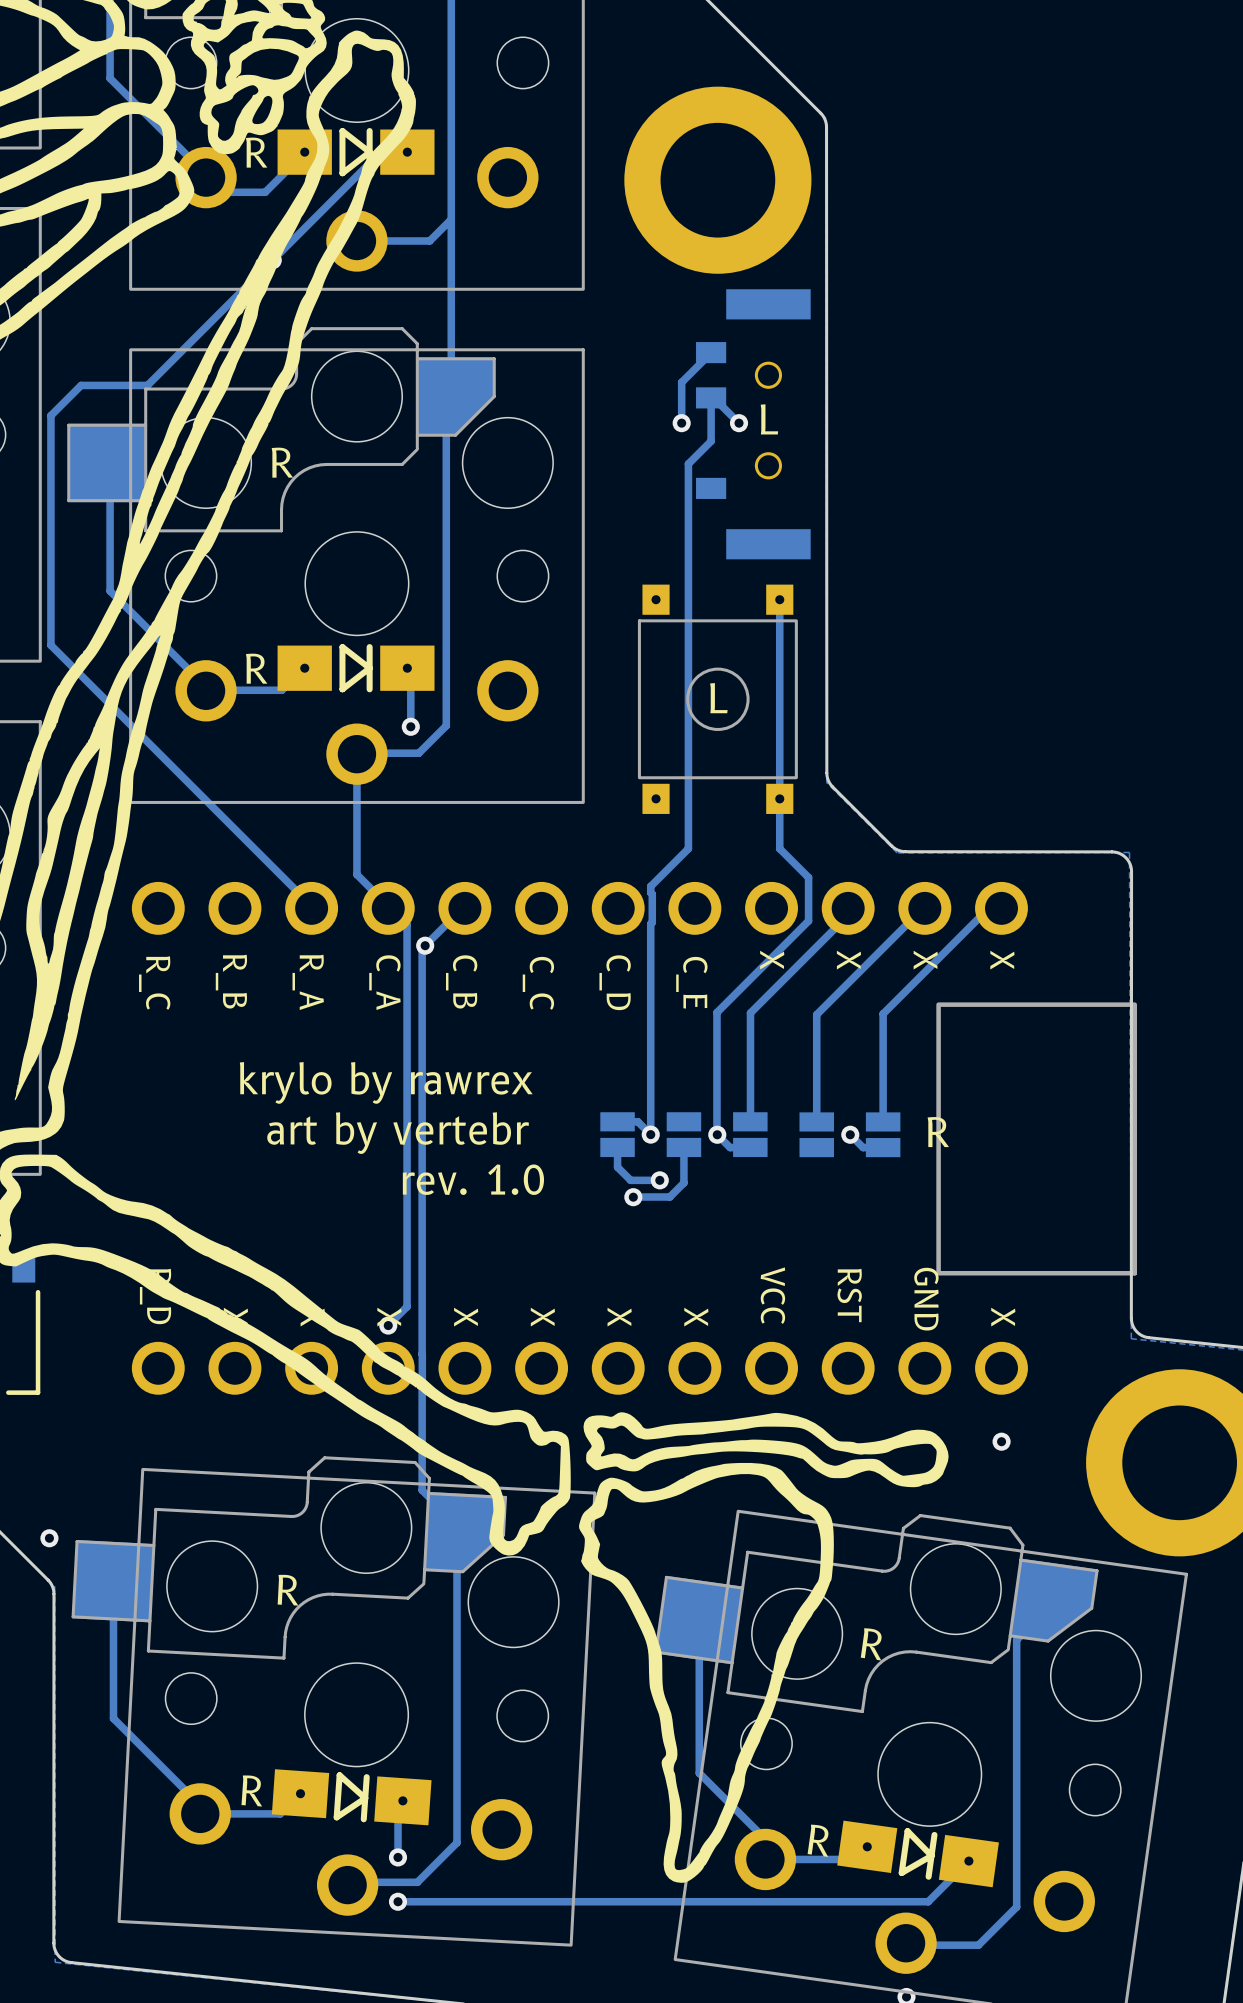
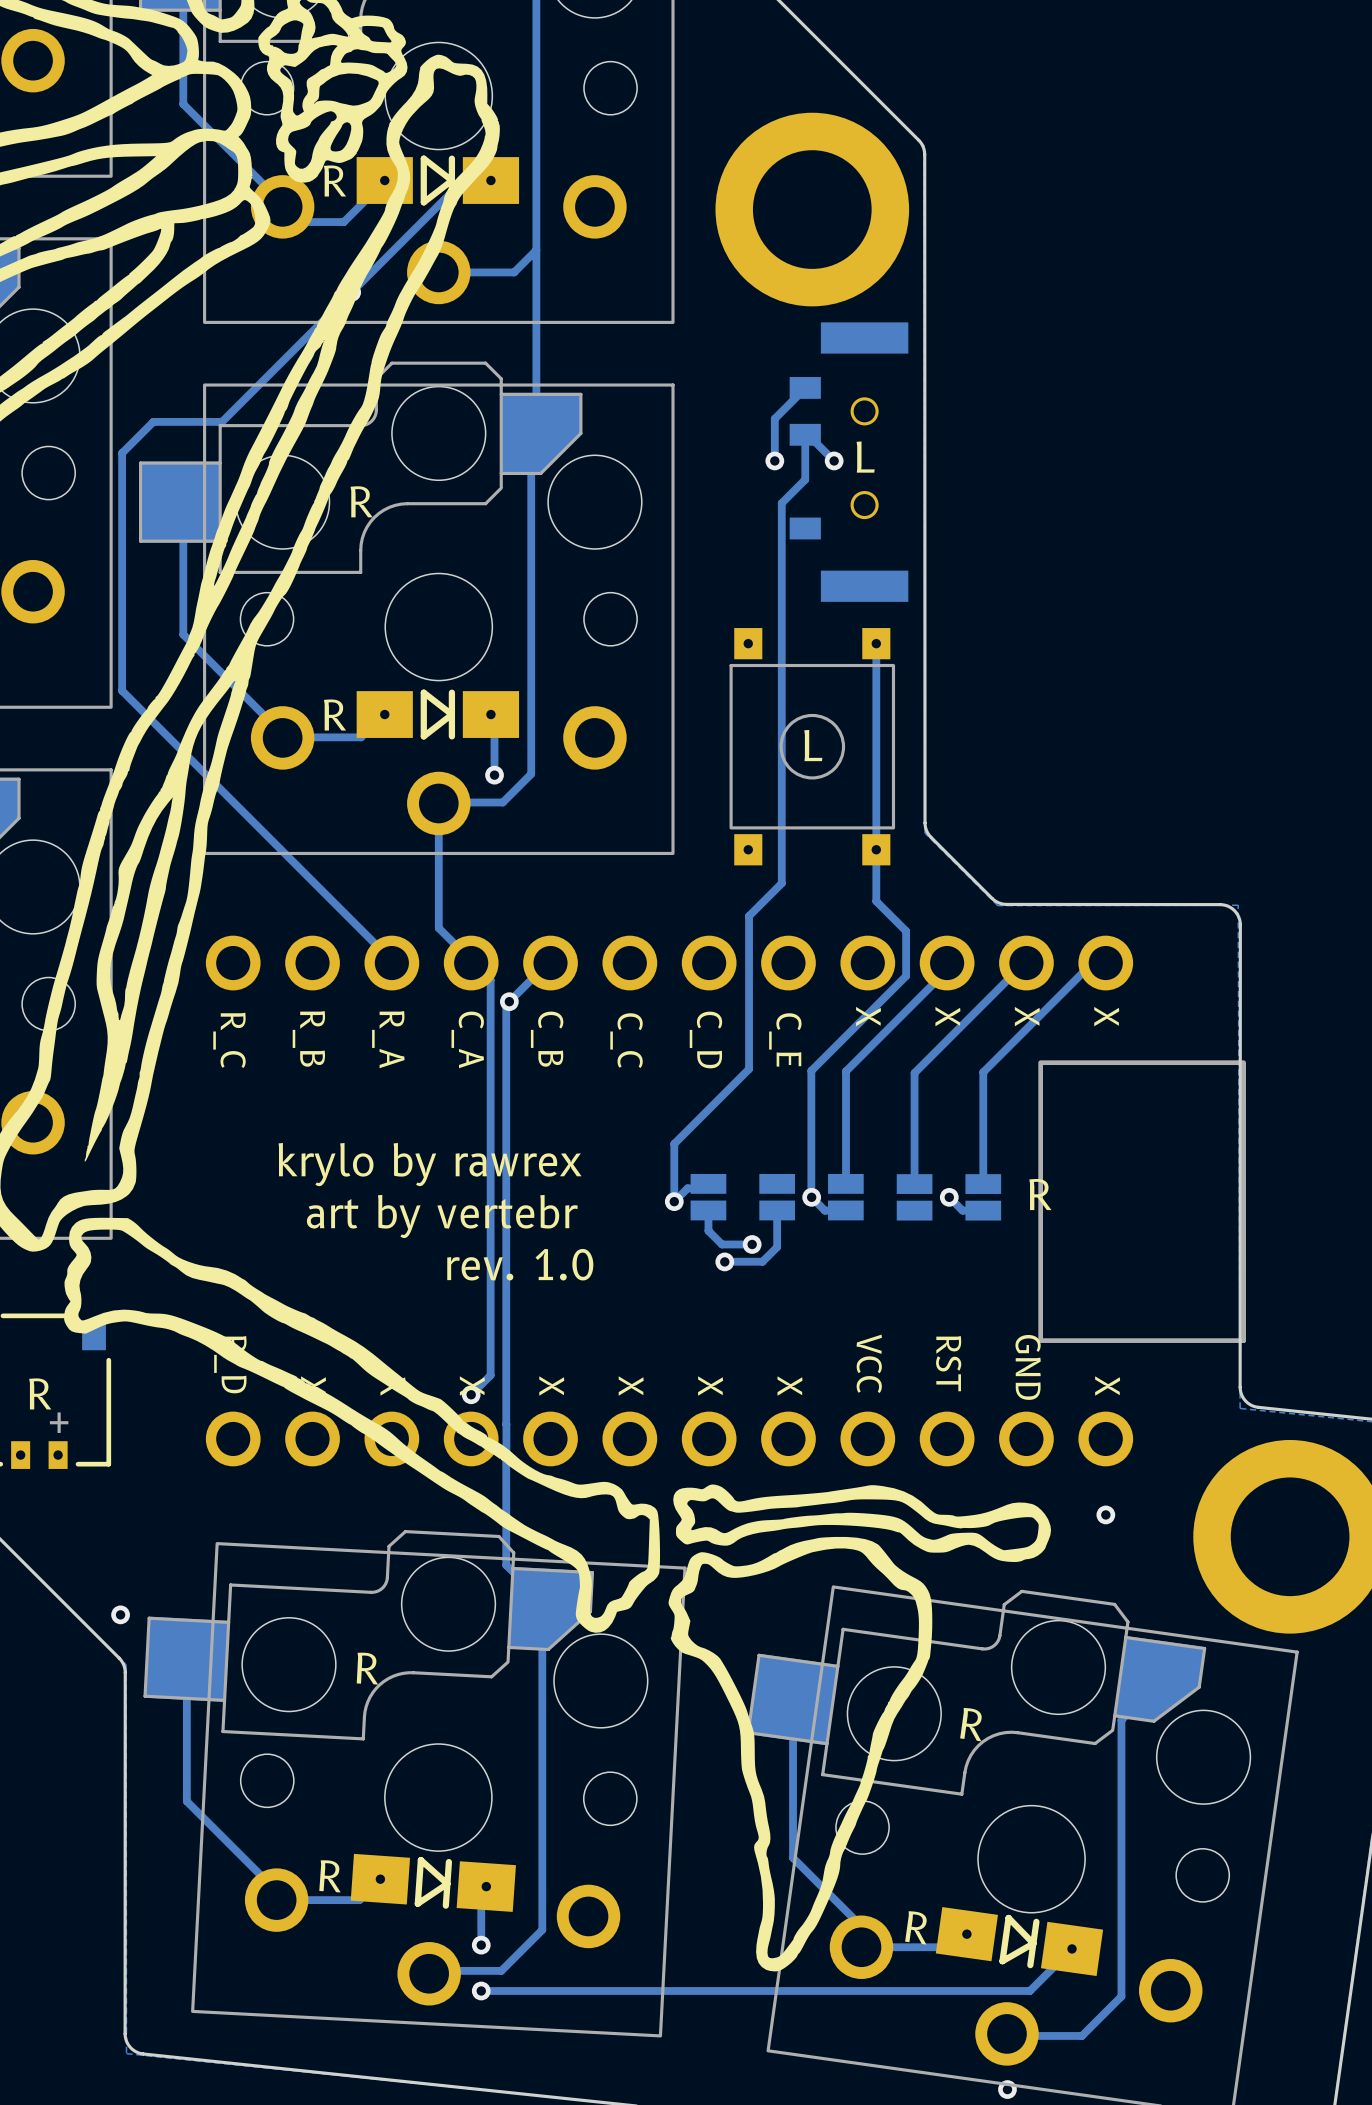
track: (688, 831) (688, 848) (650, 886) (652, 894) (650, 1134) (637, 1121) (617, 1121) -> (781, 883) (749, 916) (749, 1069) (674, 1143) (674, 1201) (687, 1188) (708, 1188)
drawing position: (391, 1128) -> (435, 1211)
via position: (650, 1134) -> (674, 1201)

